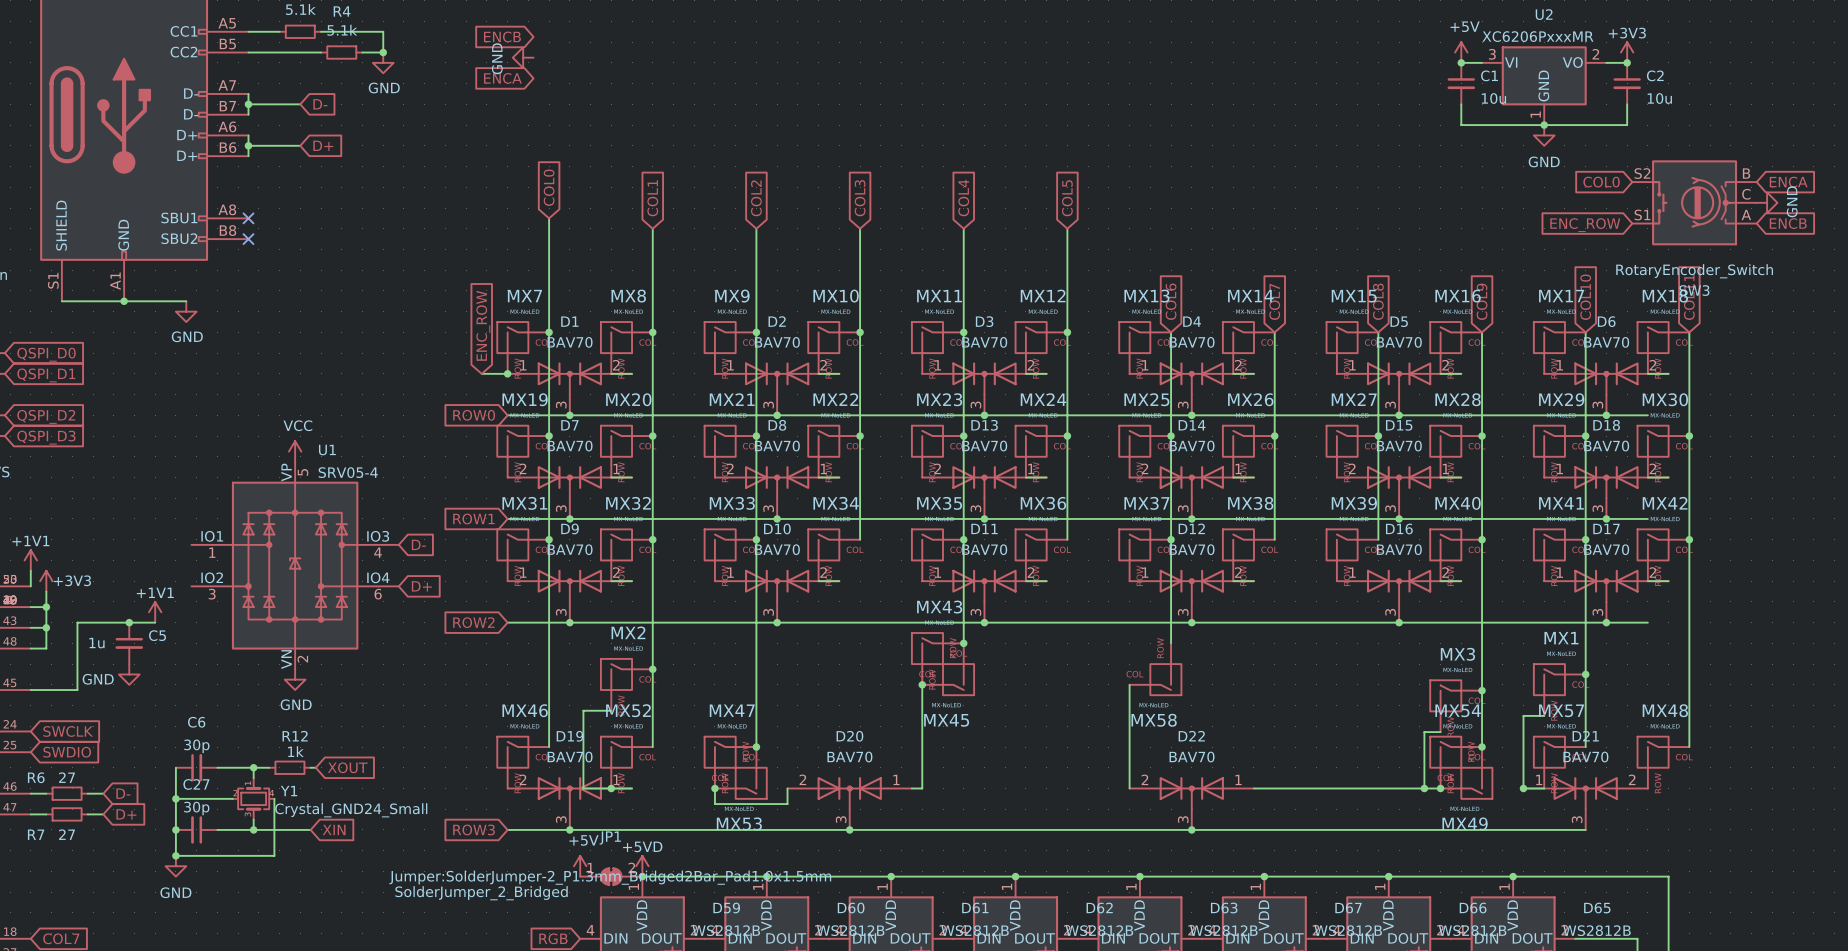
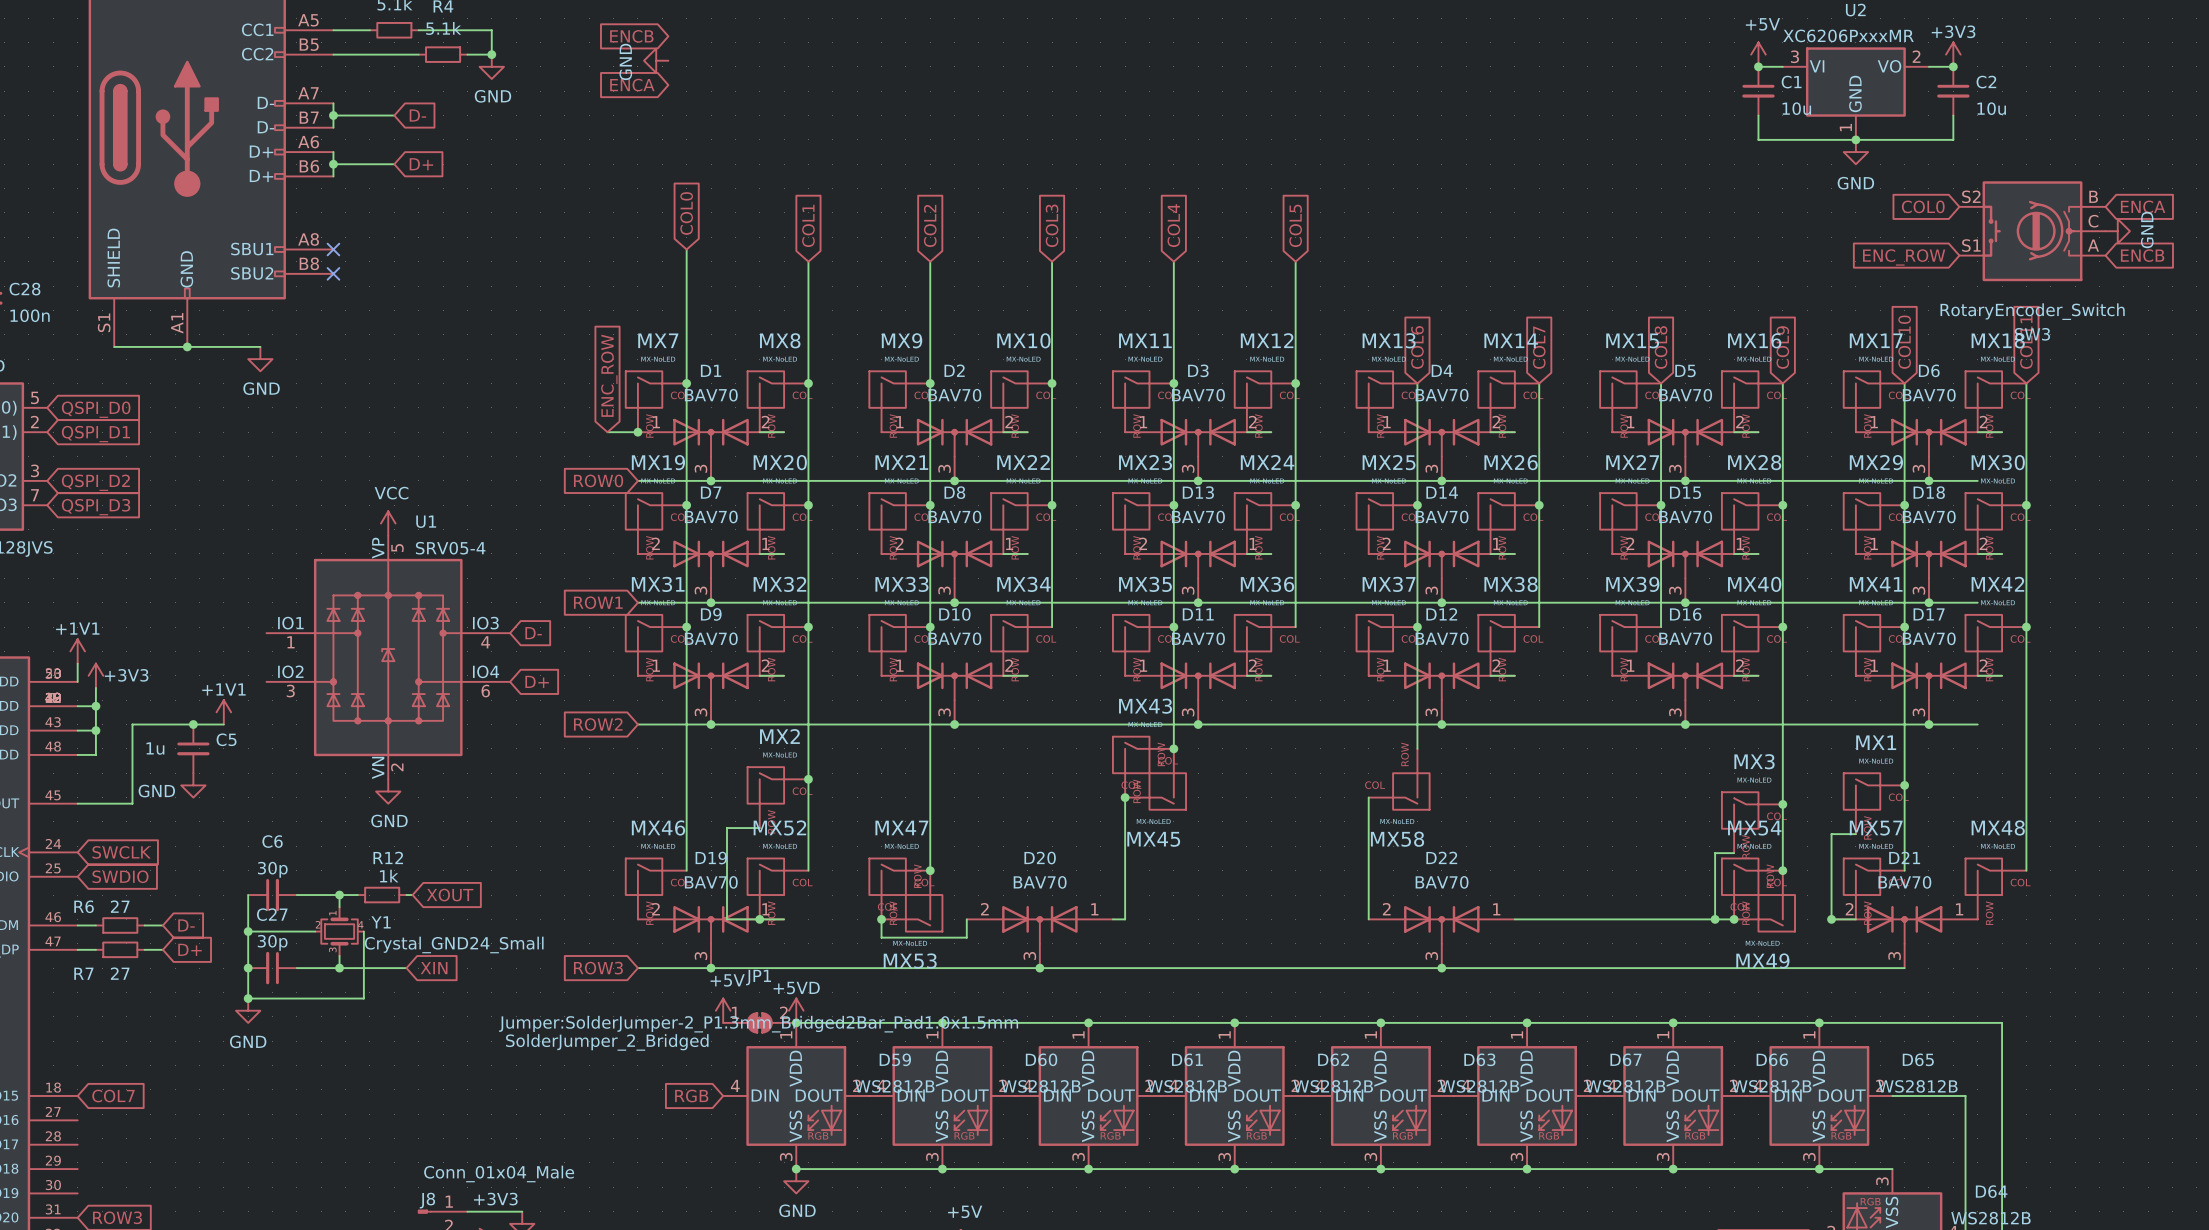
D21 flip: as is (1585, 793) -> left-right (1904, 924)

